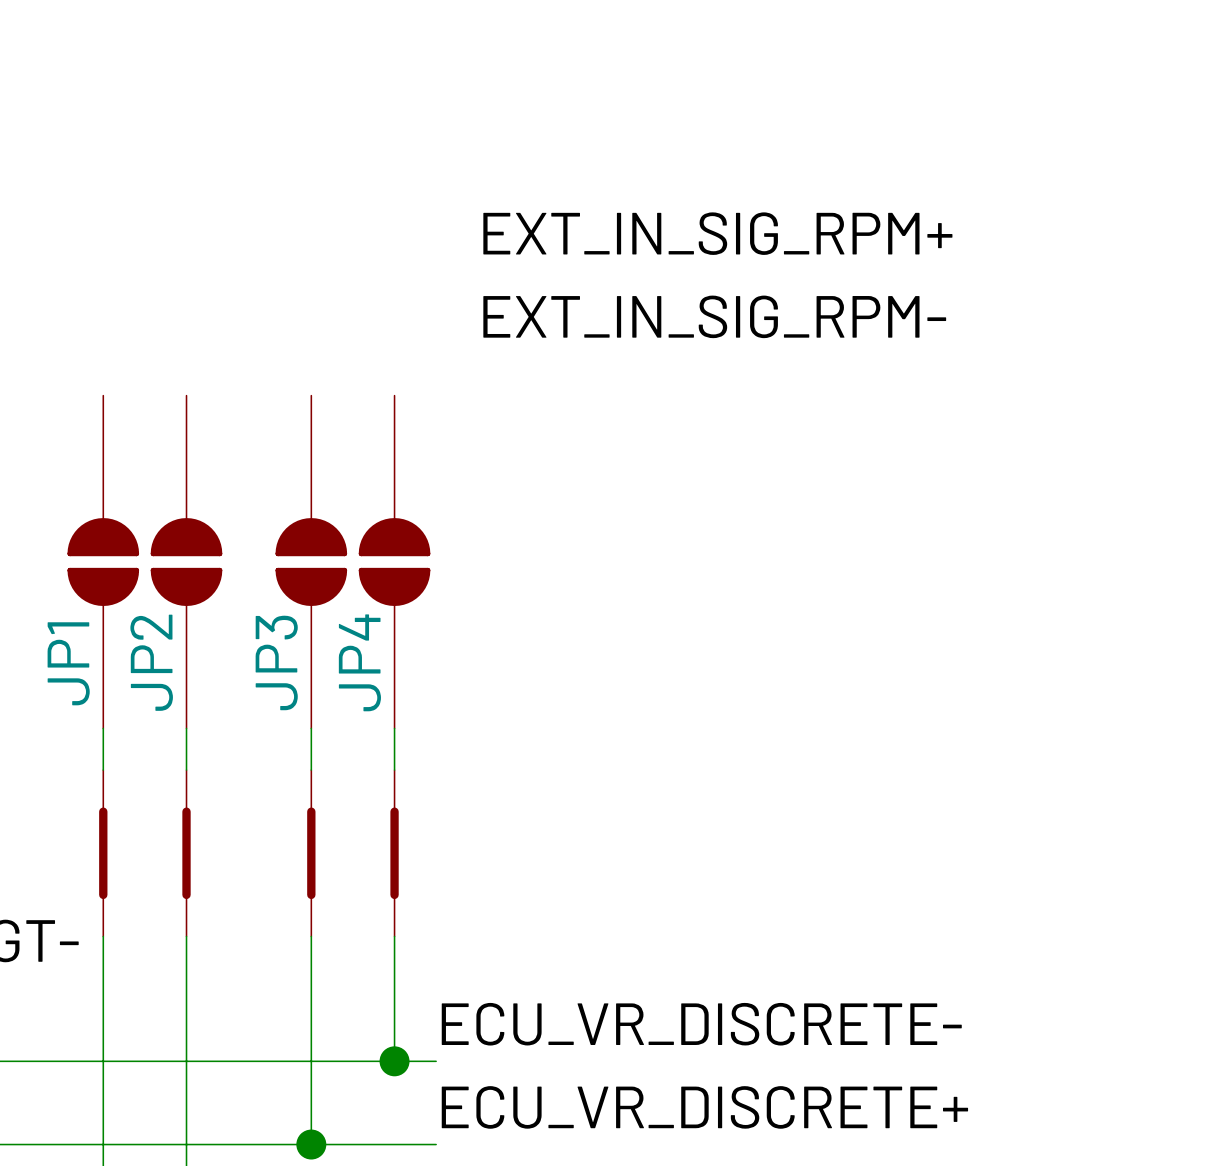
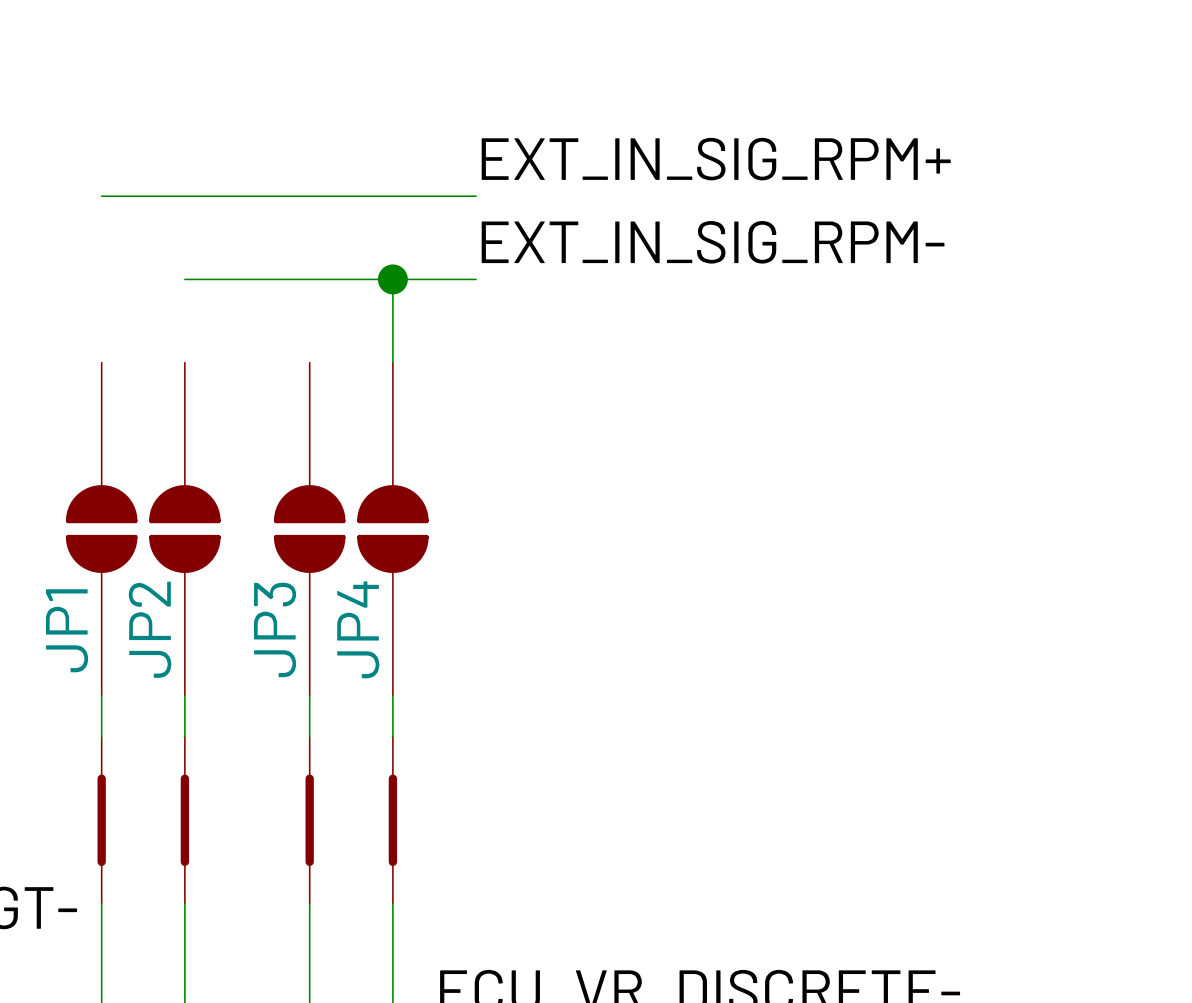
wire: none -> (101, 196) (476, 196)
label position: EXT_IN_SIG_RPM+ (717, 233) -> EXT_IN_SIG_RPM+ (716, 159)
wire: none -> (184, 279) (476, 279)
wire: none -> (392, 279) (392, 362)
junction: none -> (392, 279)
label position: EXT_IN_SIG_RPM- (714, 316) -> EXT_IN_SIG_RPM- (713, 242)

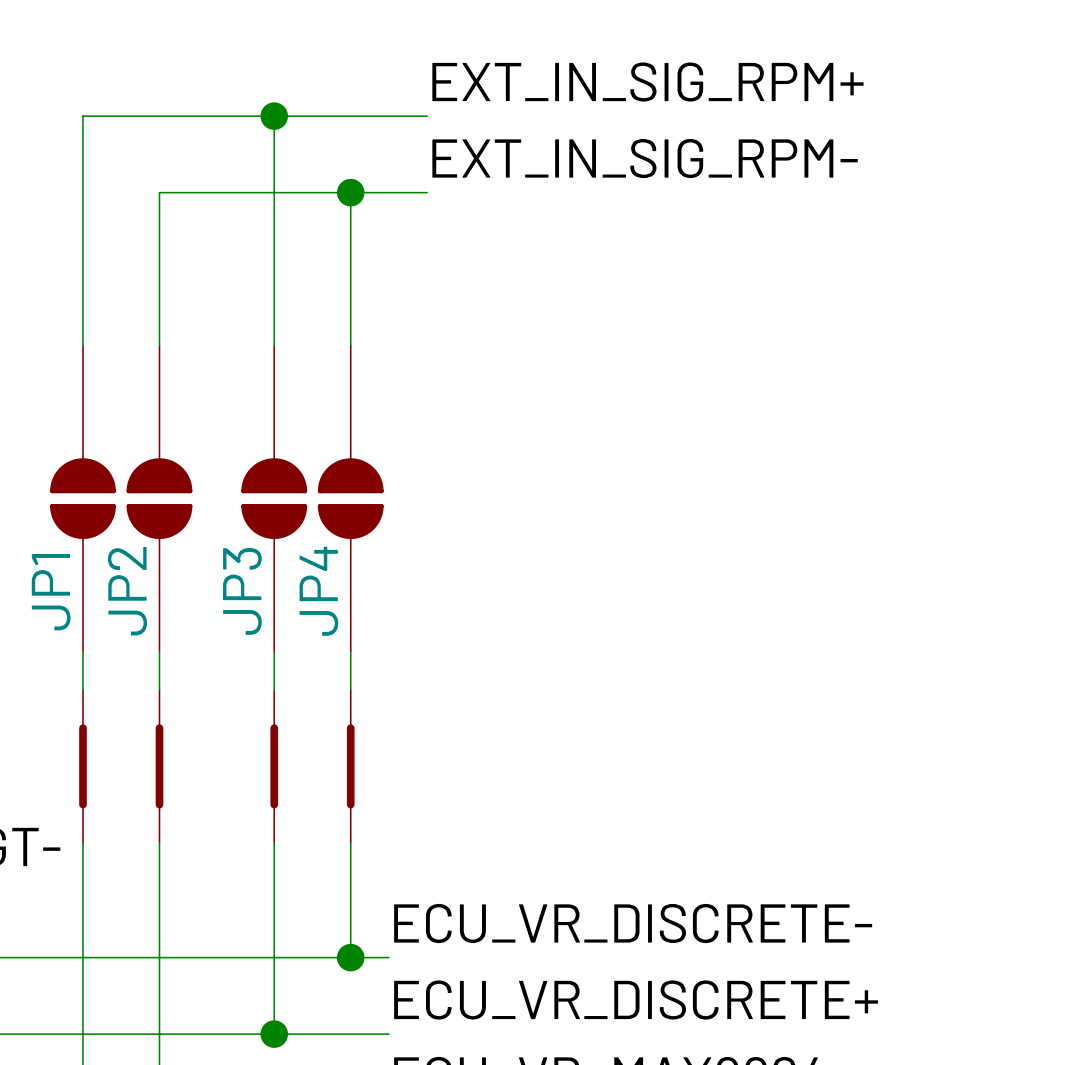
label: none -> EXT_IN_SIG_RPM+ (647, 82)
wire: none -> (274, 116) (274, 345)
junction: none -> (274, 116)
wire: none -> (427, 116) (82, 116) (82, 345)
label: EXT_IN_SIG_RPM+ (716, 159) -> EXT_IN_SIG_RPM- (645, 158)
wire: (101, 196) (184, 196) -> (159, 345) (159, 192)
wire: none -> (350, 192) (350, 269)
label: EXT_IN_SIG_RPM- (713, 242) -> none
wire: (184, 279) (476, 279) -> none
junction position: (392, 279) -> (350, 192)

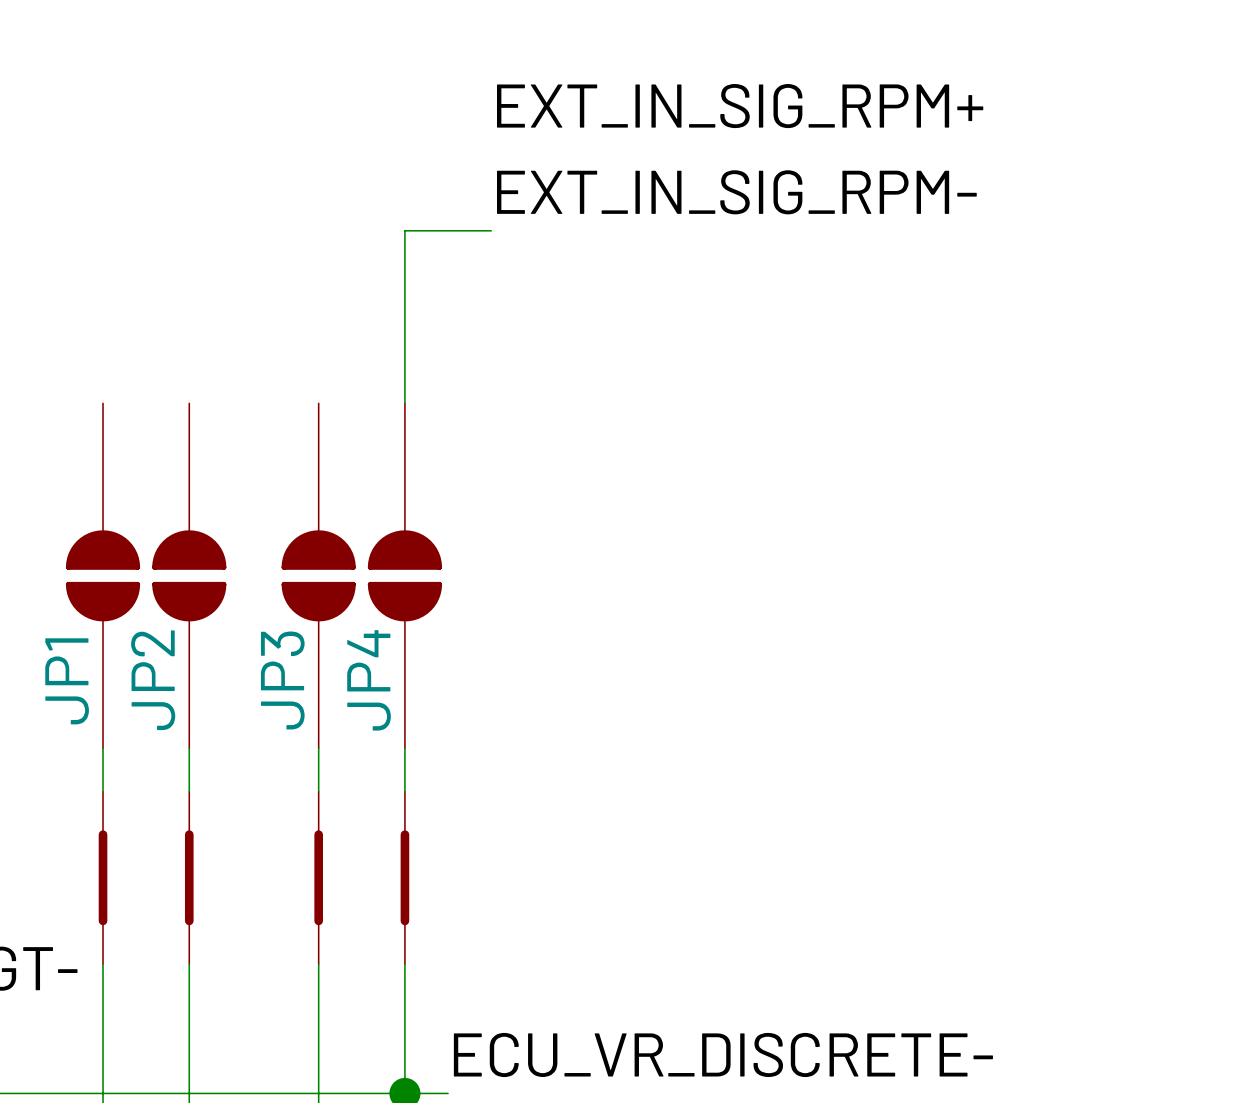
wire: (274, 116) (274, 345) -> none
junction: (274, 116) -> none
wire: (427, 116) (82, 116) (82, 345) -> none
wire: (350, 192) (159, 192) (159, 345) -> none
junction: (350, 192) -> none

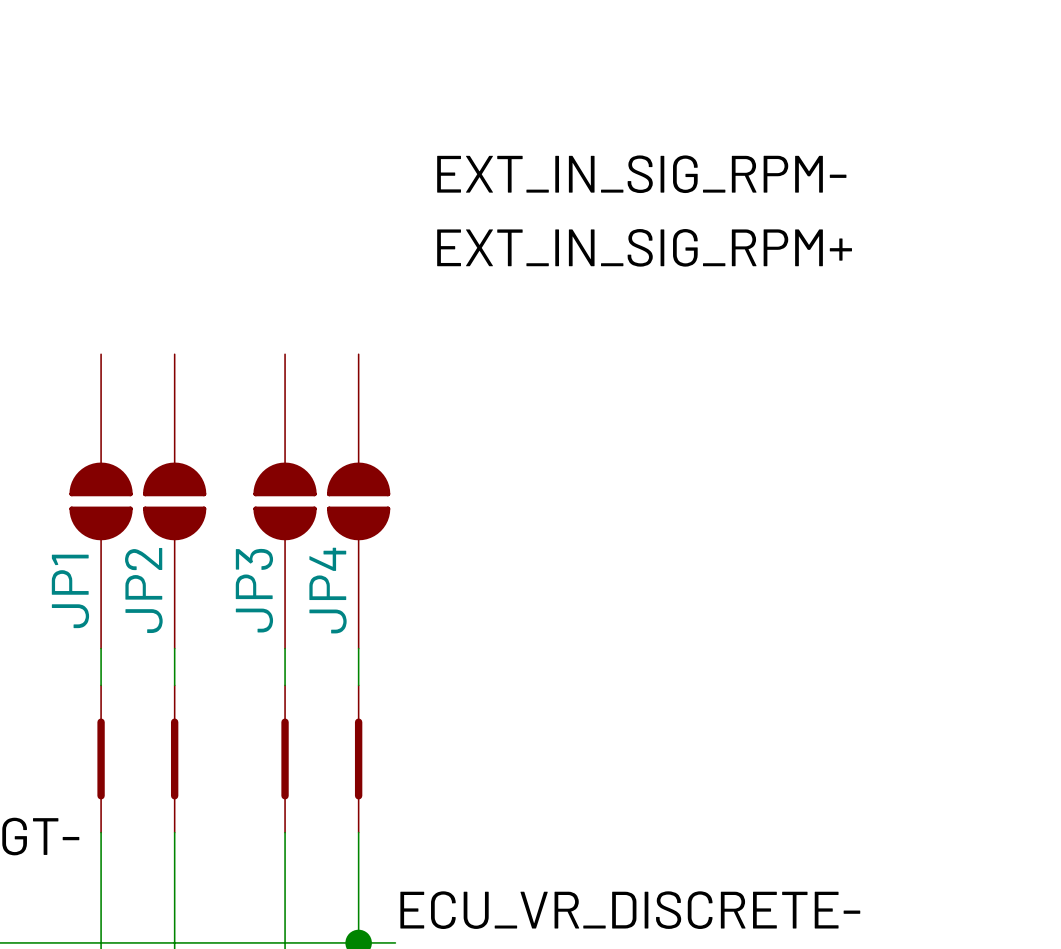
label position: EXT_IN_SIG_RPM+ (740, 106) -> EXT_IN_SIG_RPM+ (644, 247)
wire: (491, 230) (404, 230) (404, 403) -> none

